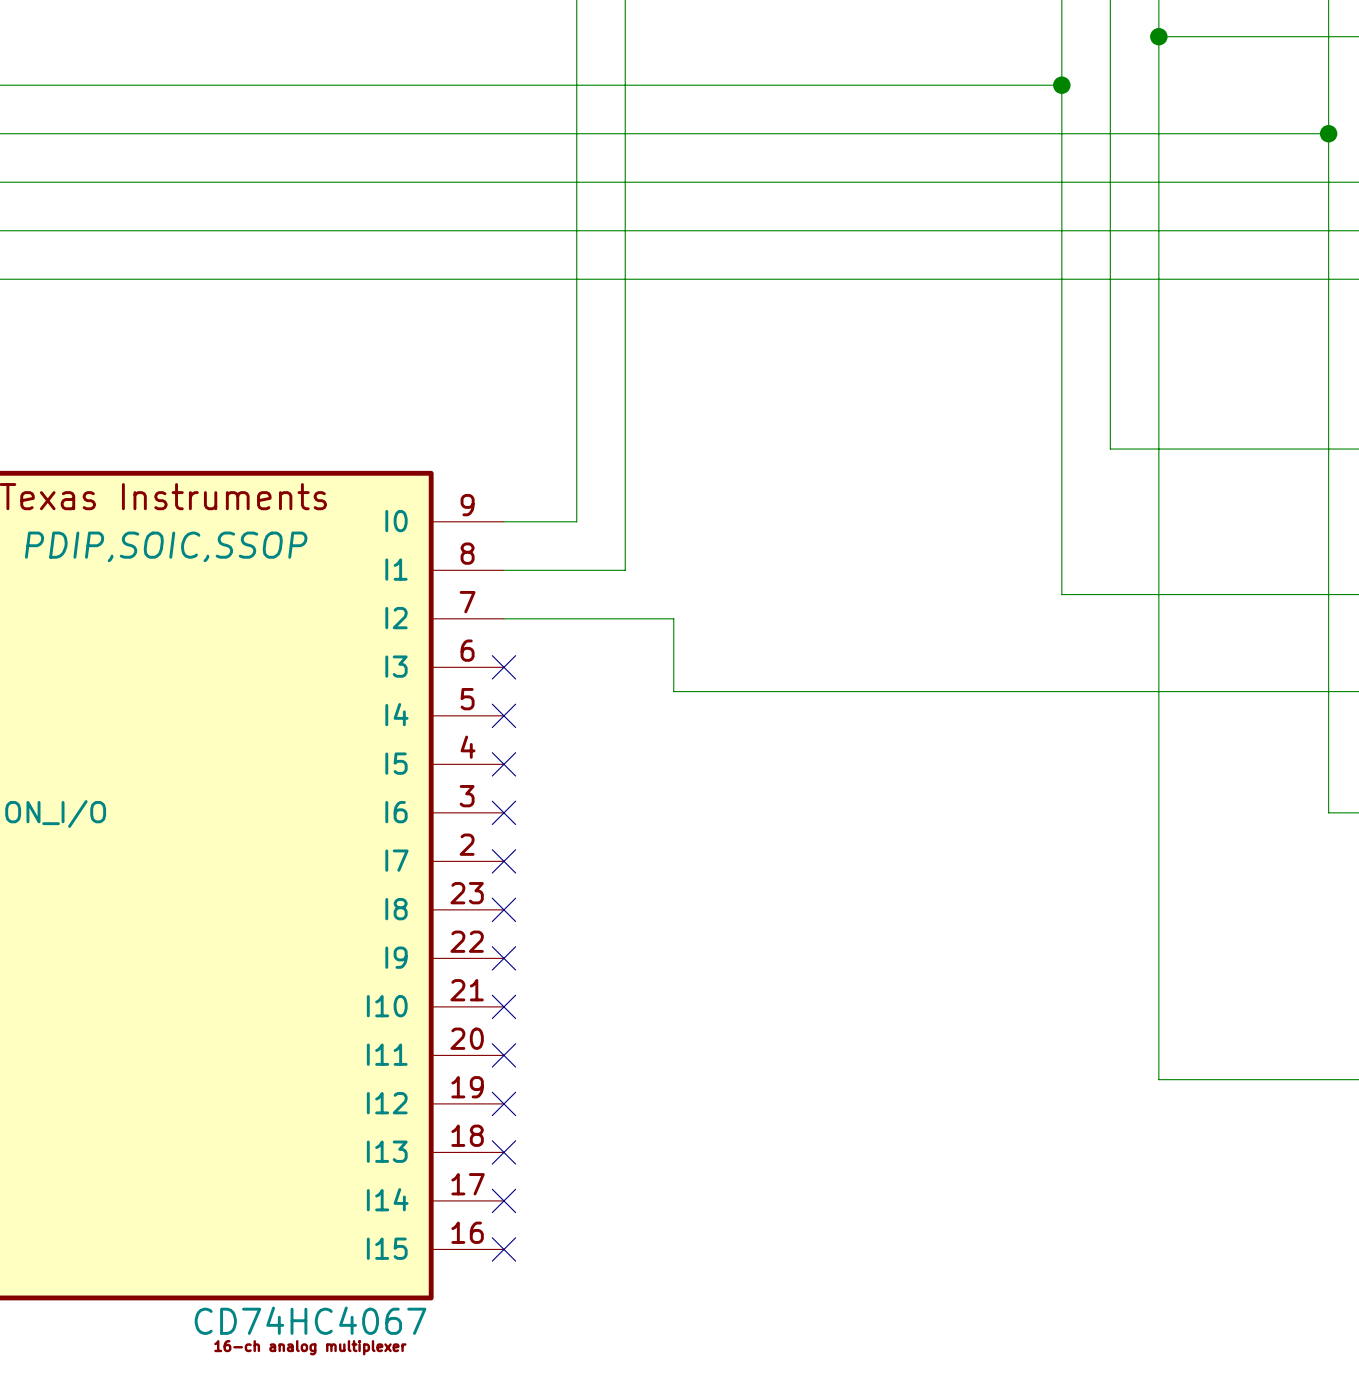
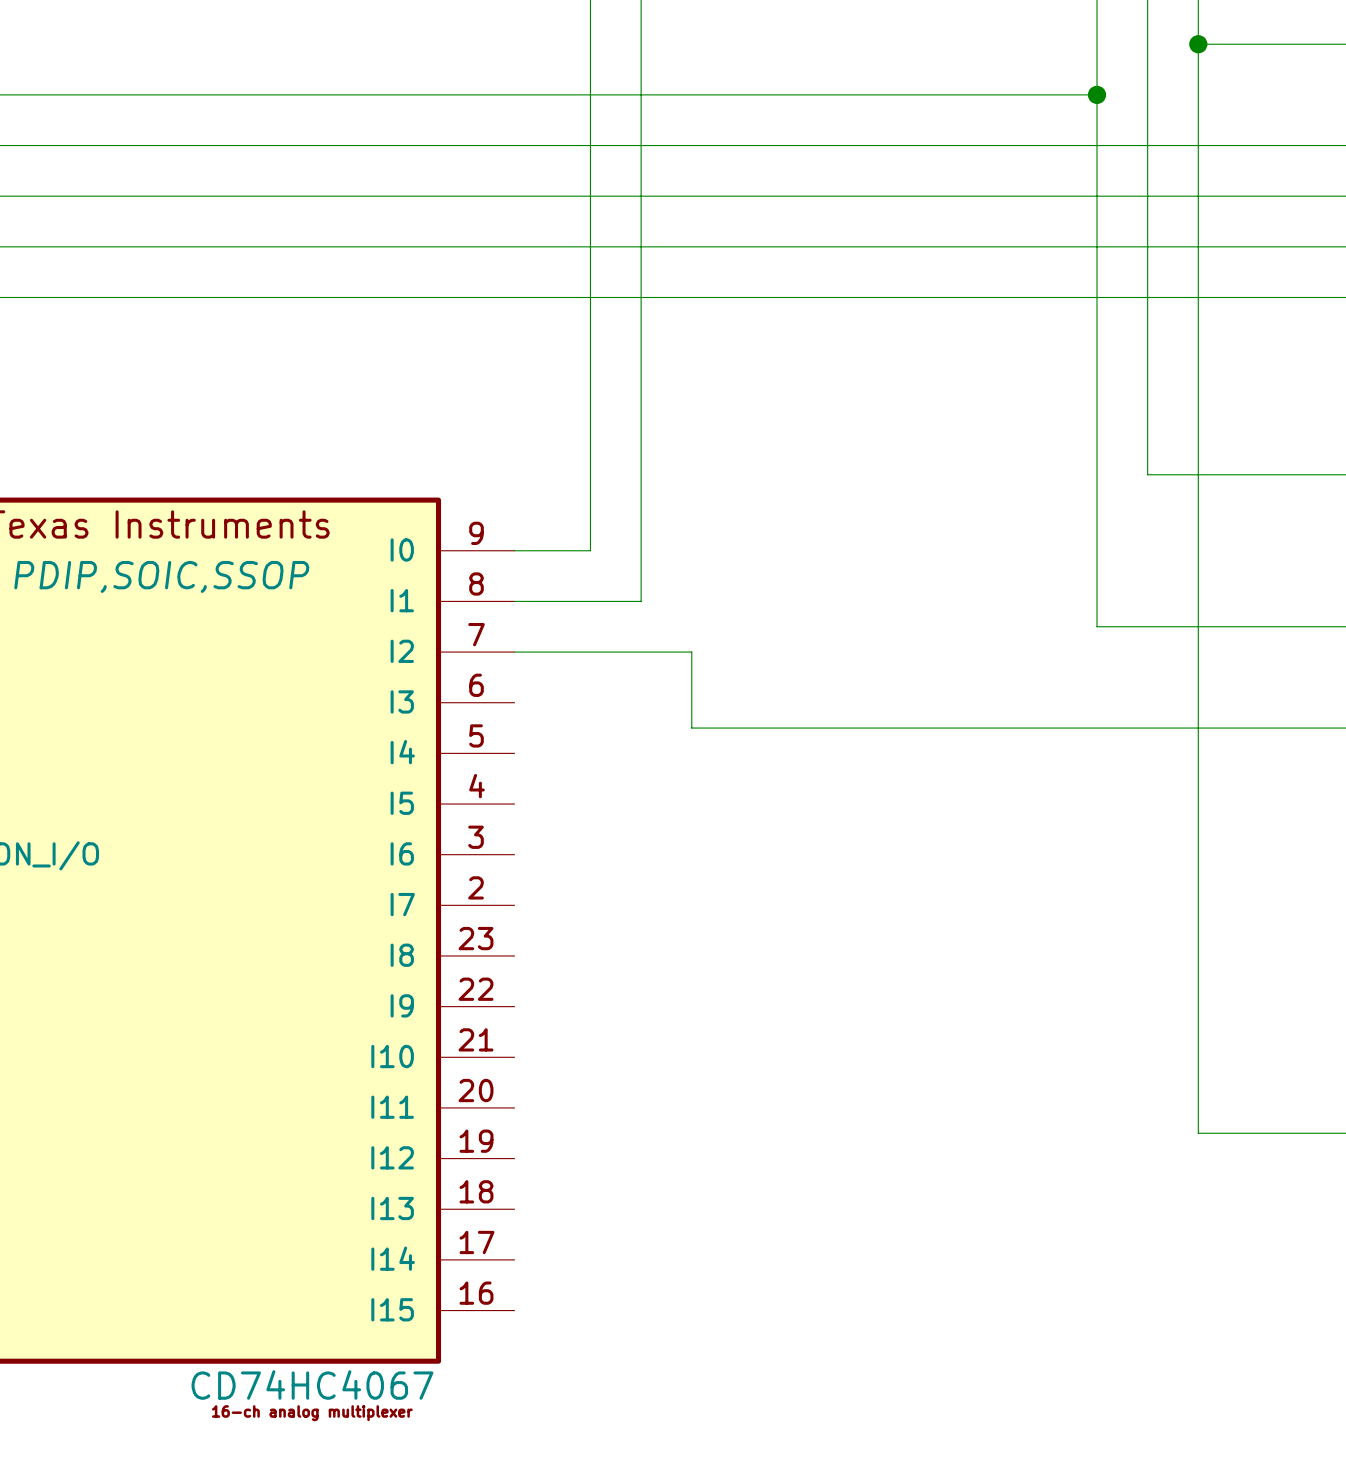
no-connect mark: (503, 667) -> none
no-connect mark: (503, 715) -> none
no-connect mark: (503, 764) -> none
no-connect mark: (503, 812) -> none
no-connect mark: (503, 861) -> none
no-connect mark: (503, 909) -> none
no-connect mark: (503, 958) -> none
no-connect mark: (503, 1006) -> none
no-connect mark: (503, 1055) -> none
no-connect mark: (503, 1103) -> none
no-connect mark: (503, 1152) -> none
no-connect mark: (503, 1200) -> none
no-connect mark: (503, 1249) -> none

